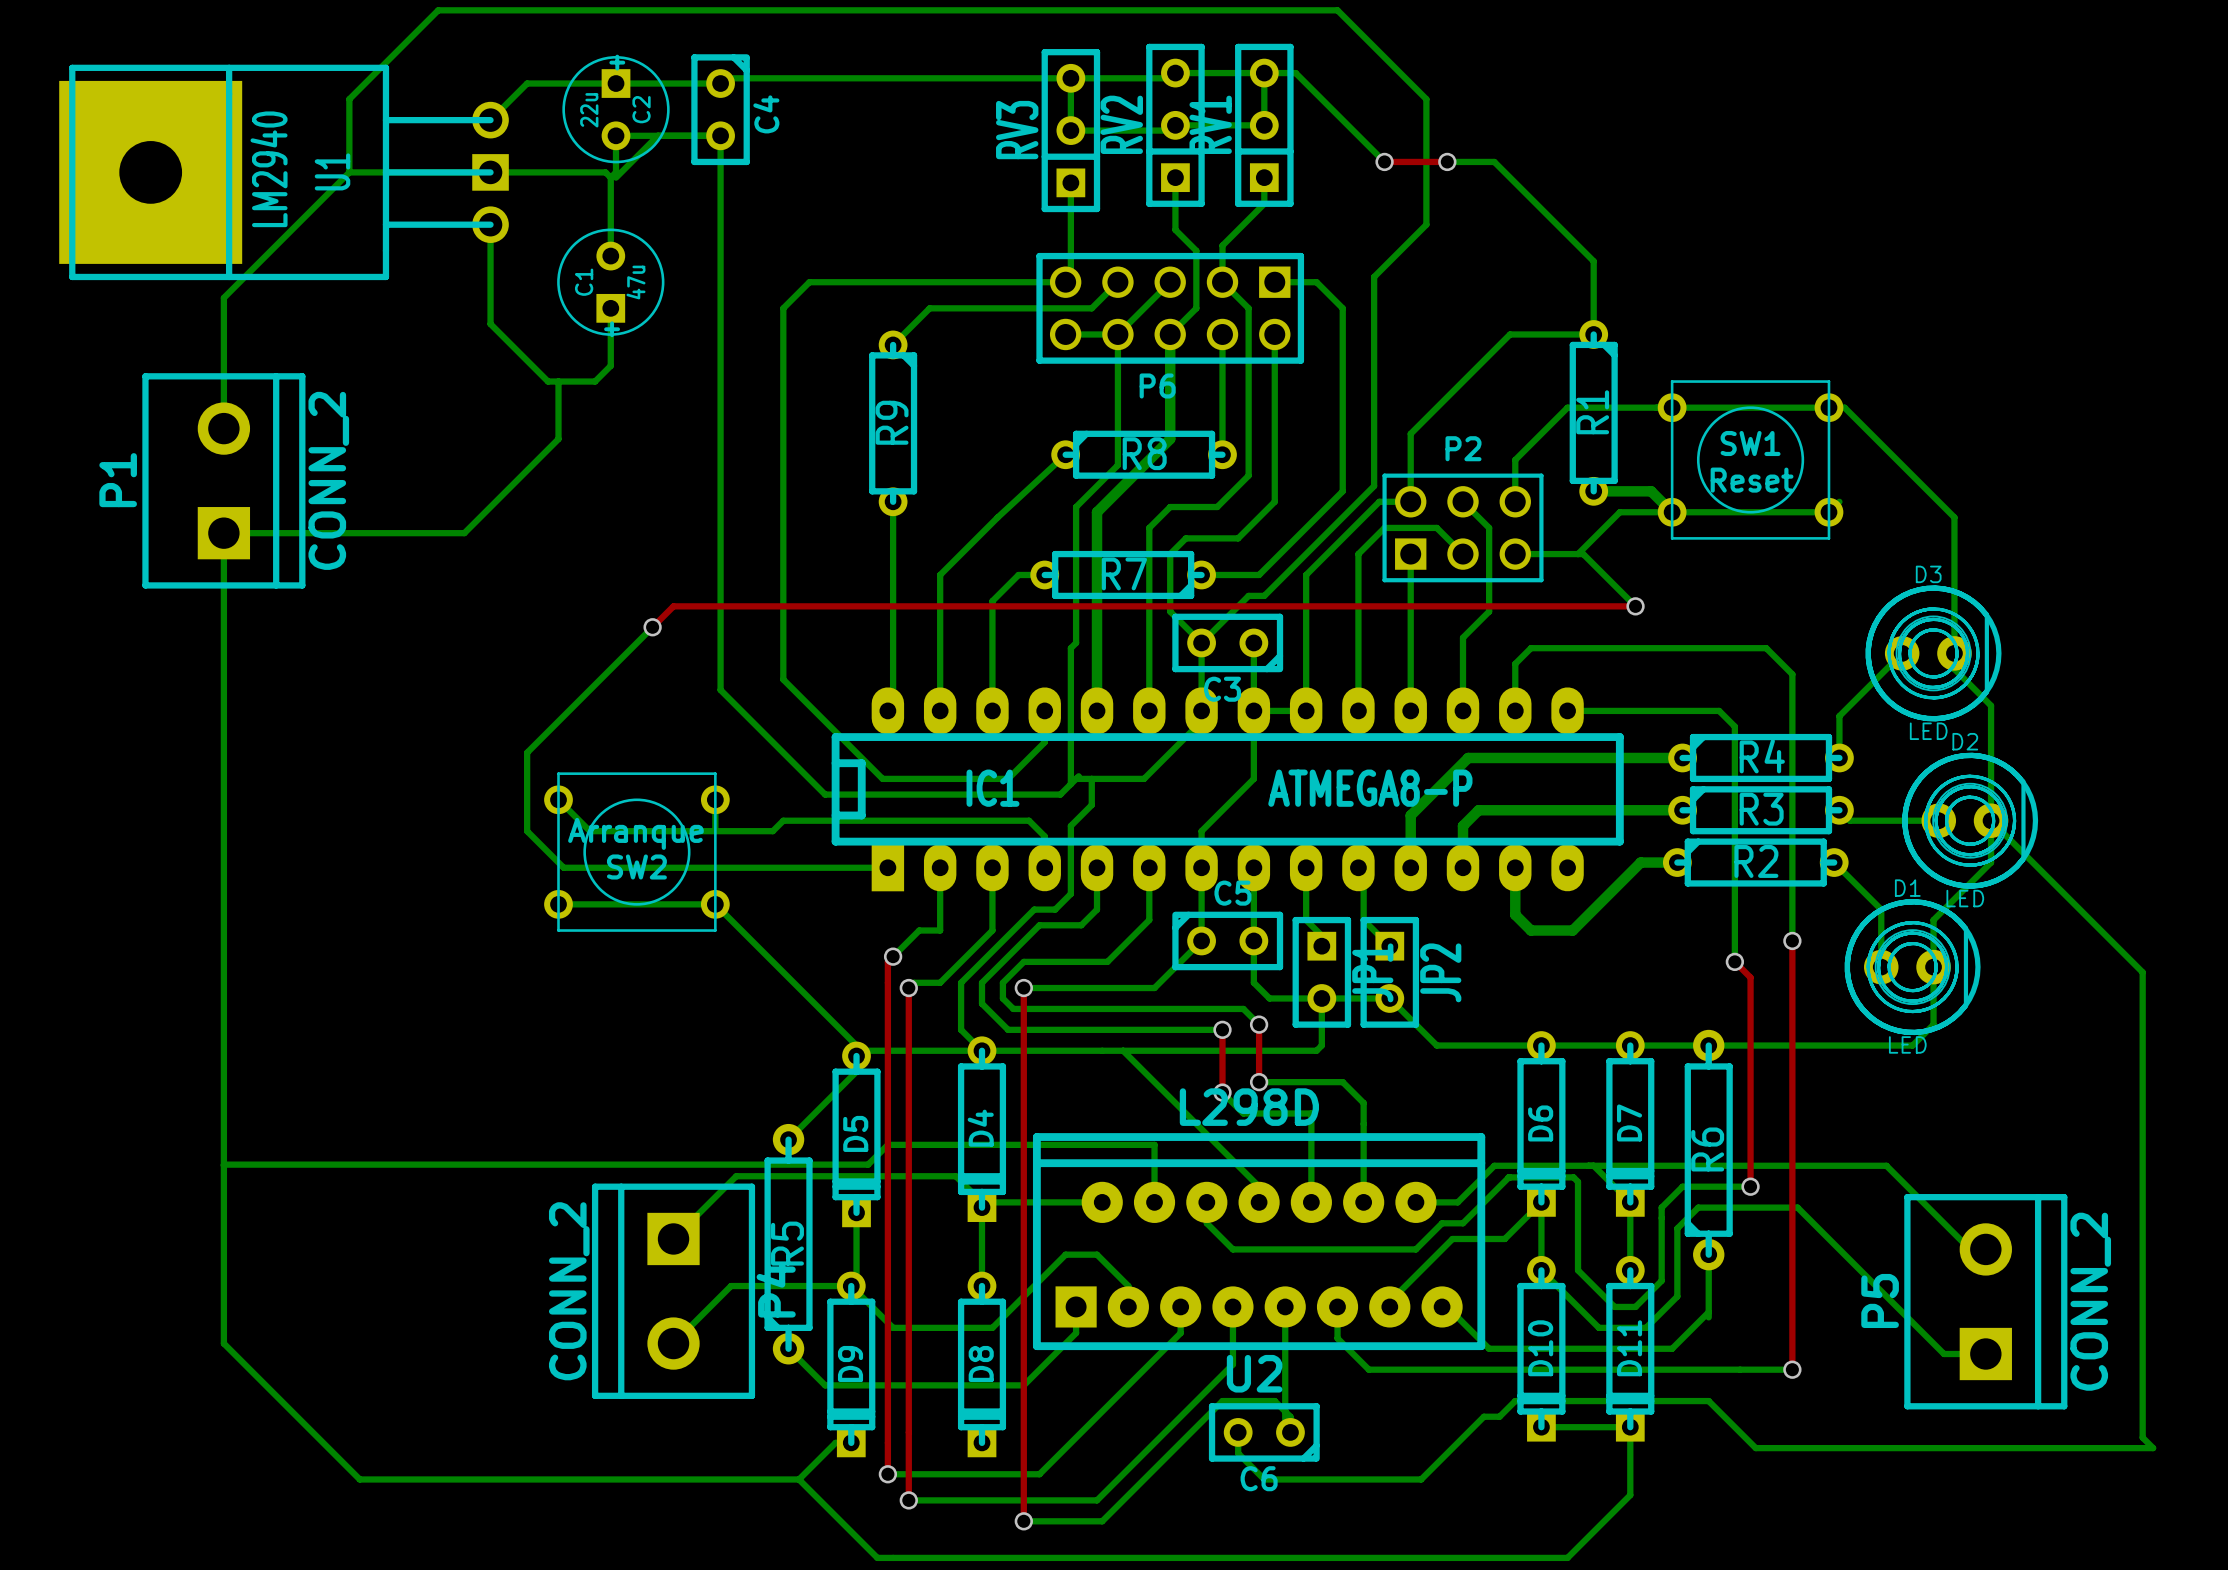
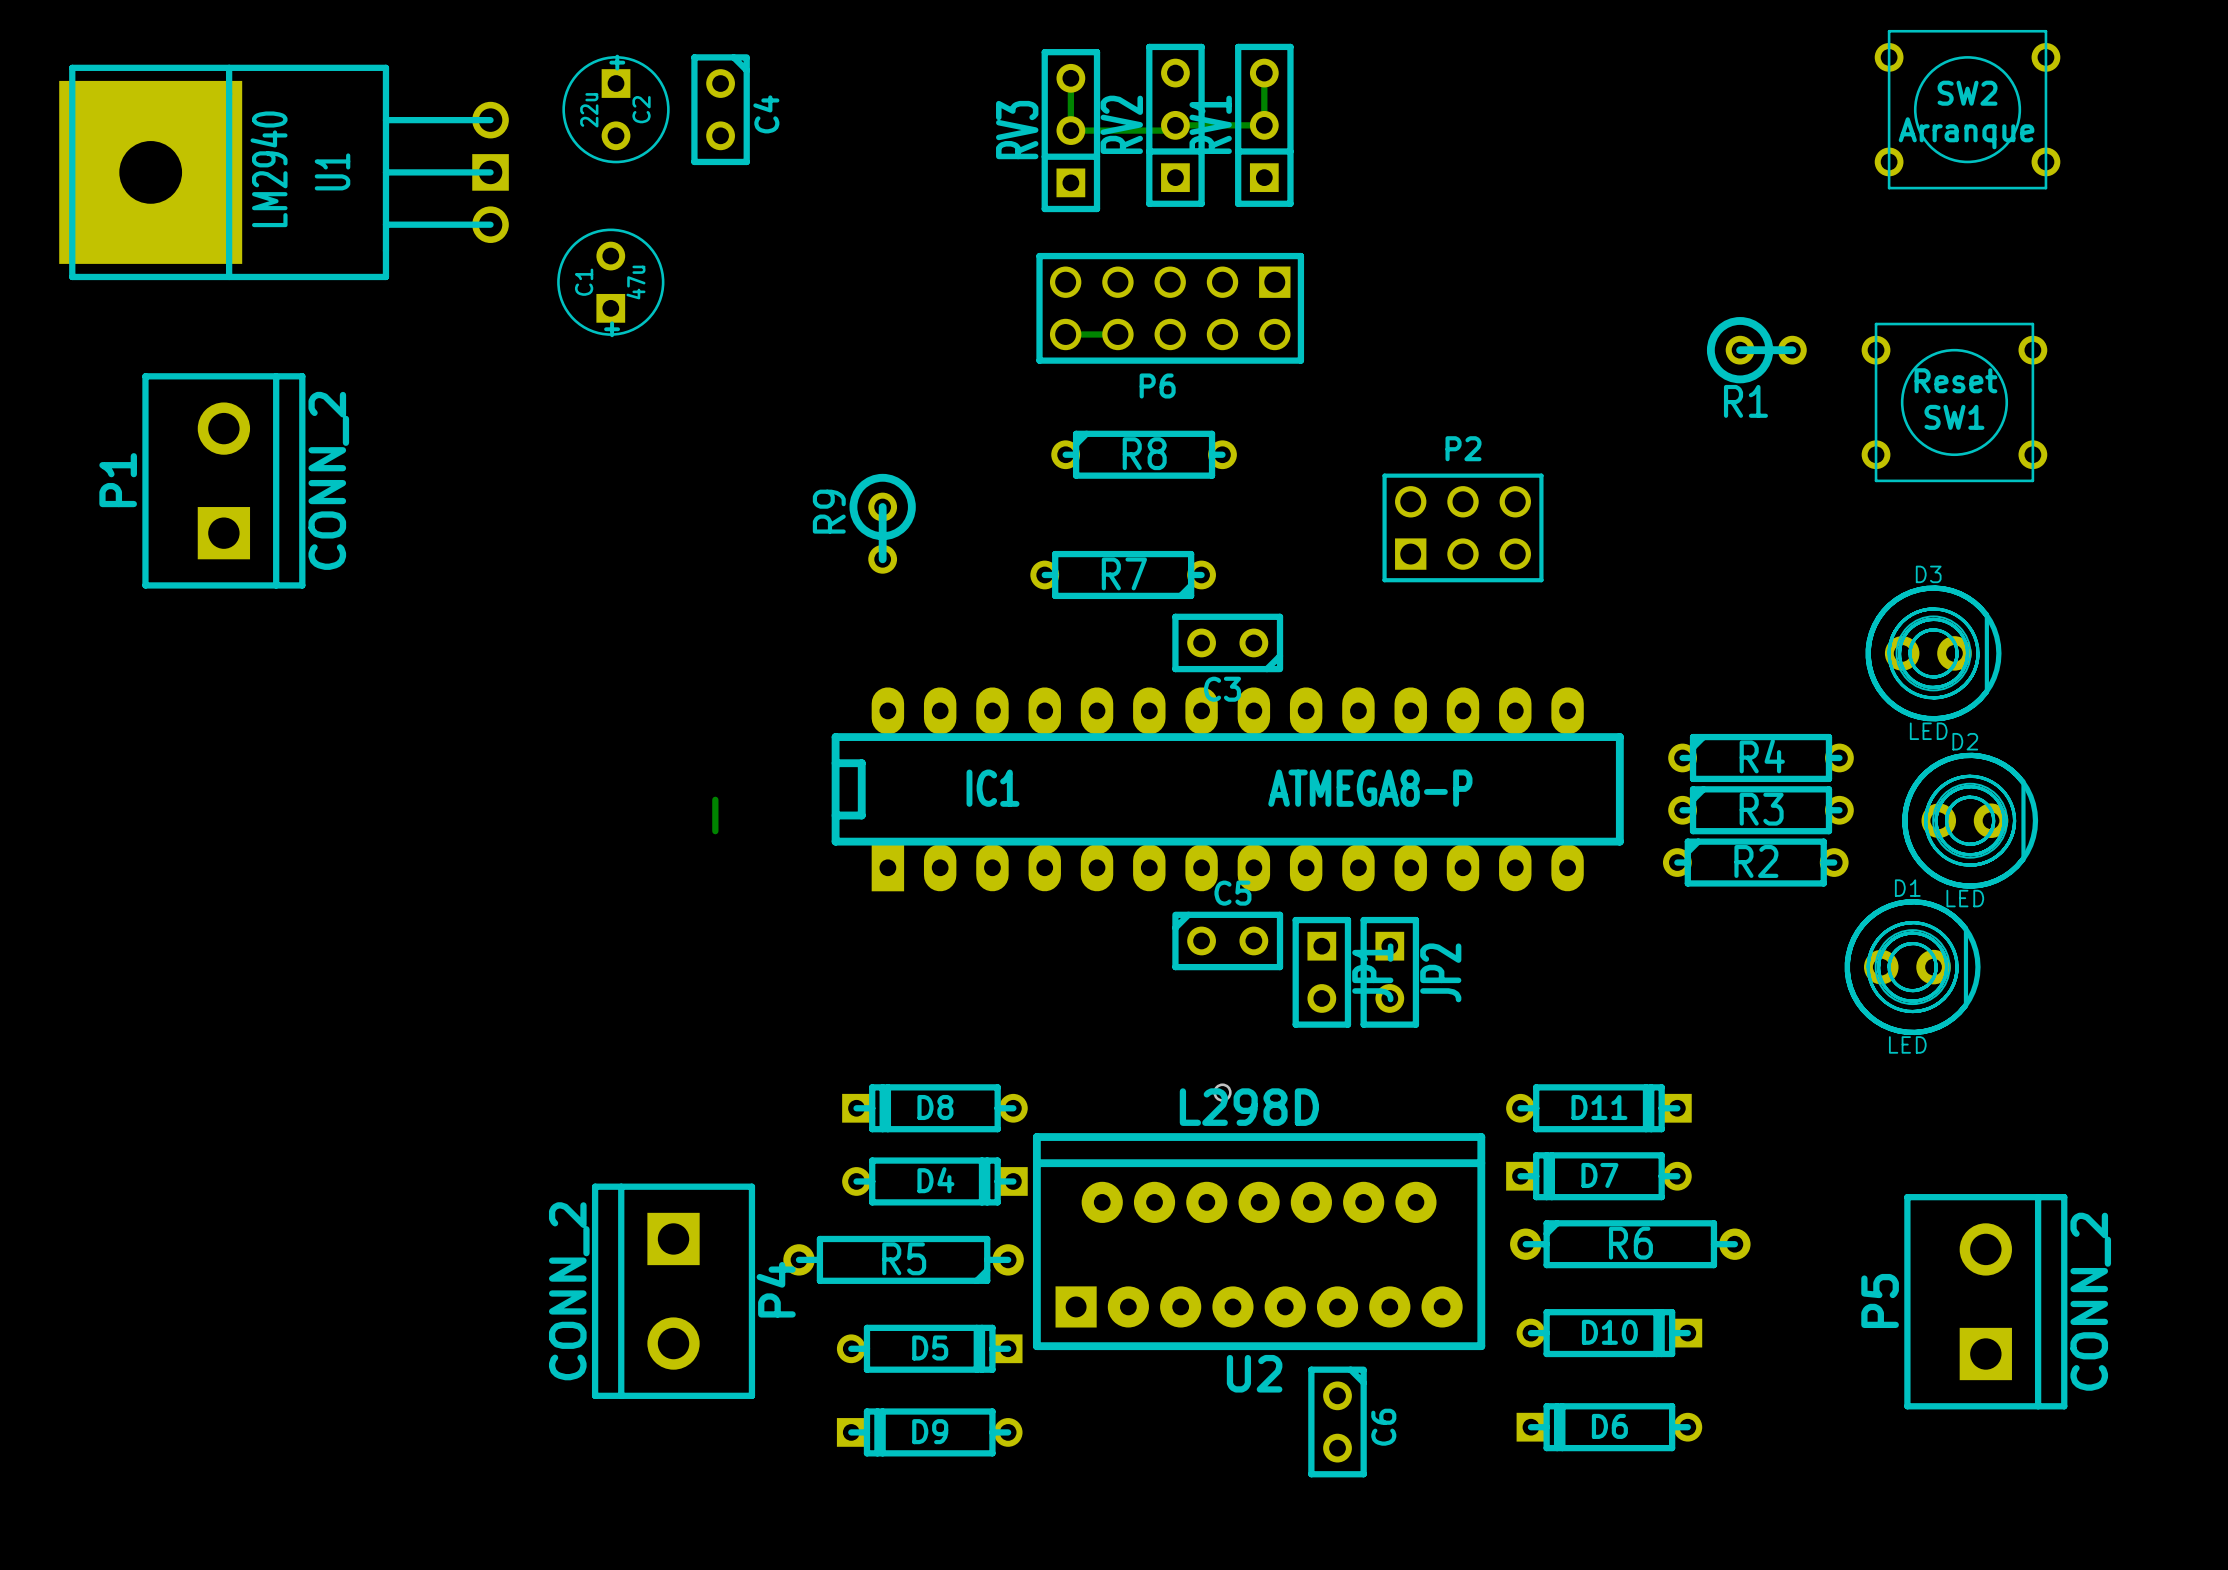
bottom track: (490, 120) (527, 83) (720, 83) (725, 78) (1170, 78) (1175, 73) (1295, 73) (1384, 161) -> none
bottom track: (657, 135) (616, 177) -> none
top track: (1384, 161) (1447, 161) -> none
via: (1384, 161) -> none
bottom track: (1447, 161) (1494, 161) (1593, 261) (1593, 334) (1510, 334) (1410, 433) (1410, 501) (1379, 501) (1306, 574) (1306, 710) (1253, 710) -> none
via: (1447, 161) -> none
bottom track: (349, 172) (349, 99) (438, 10) (1337, 10) (1426, 99) (1426, 224) (1374, 276) (1374, 486) (1264, 595) (1248, 595) (1201, 642) -> none
bottom track: (349, 172) (605, 172) (610, 177) -> none
bottom track: (349, 172) (223, 297) (223, 428) -> none
bottom track: (610, 177) (610, 256) -> none
bottom track: (610, 177) (616, 172) (616, 135) (720, 135) (720, 690) (825, 794) (1060, 794) (1078, 776) -> none
bottom track: (1175, 177) (1175, 229) (1196, 250) (1196, 308) (1170, 334) (1170, 439) (1097, 512) (1097, 710) -> none
bottom track: (1264, 177) (1264, 203) (1222, 245) (1222, 282) (1248, 308) (1248, 475) (1217, 507) (1170, 507) (1149, 527) (1149, 710) -> none
bottom track: (1070, 182) (1070, 276) (1065, 282) (809, 282) (783, 308) (783, 679) (882, 778) (1008, 778) (1044, 742) (1044, 710) -> none
bottom track: (490, 224) (490, 324) (548, 381) (595, 381) (610, 365) (610, 308) -> none
bottom track: (1117, 282) (1091, 308) (929, 308) (893, 344) -> none
bottom track: (1170, 282) (1117, 334) (1117, 465) (1076, 507) (1076, 642) (1070, 648) (1070, 784) -> none
bottom track: (1274, 282) (1316, 282) (1342, 308) (1342, 491) (1259, 574) (1201, 574) -> none
R1 footprint: [1569, 320, 1618, 506] -> [1706, 317, 1807, 384]
R9 footprint: [869, 330, 918, 517] -> [849, 473, 916, 574]
bottom track: (1222, 334) (1222, 454) -> none
bottom track: (1274, 334) (1274, 501) (1238, 538) (1185, 538) (1170, 554) (1170, 611) (1201, 642) -> none
bottom track: (558, 381) (558, 439) (464, 533) (223, 533) (223, 1343) (359, 1479) (799, 1479) -> none
R1 name position: R1 (1592, 412) -> R1 (1745, 401)
R9 name position: R9 (892, 422) -> R9 (829, 511)
SW1 name position: SW1 (1750, 443) -> SW1 (1954, 417)
bottom track: (1065, 454) (997, 517) (940, 574) (940, 710) -> none
SW1 position: (1750, 459) -> (1954, 402)
SW1 value position: Reset (1752, 480) -> Reset (1955, 380)
bottom track: (1593, 491) (1651, 491) (1672, 512) -> none
bottom track: (893, 501) (893, 705) (887, 710) -> none
bottom track: (1463, 501) (1489, 527) (1489, 611) (1463, 637) (1463, 710) -> none
bottom track: (1515, 501) (1515, 459) (1567, 407) (1844, 407) (1954, 517) (1954, 669) (1991, 705) (1991, 862) (1933, 920) (1933, 1024) (1912, 1045) (1436, 1045) (1389, 998) (1269, 998) (1253, 982) (1253, 867) -> none
bottom track: (1839, 501) (1828, 512) (1619, 512) (1578, 554) -> none
bottom track: (1410, 554) (1410, 710) -> none
bottom track: (1463, 554) (1436, 527) (1384, 527) (1358, 554) (1358, 710) -> none
bottom track: (1515, 554) (1583, 554) (1635, 606) -> none
bottom track: (1044, 574) (1018, 574) (992, 601) (992, 710) -> none
top track: (1635, 606) (673, 606) (652, 627) -> none
via: (1635, 606) -> none
bottom track: (652, 627) (527, 752) (527, 831) (563, 867) (887, 867) -> none
via: (652, 627) -> none
bottom track: (1201, 642) (1201, 721) (1144, 778) (1076, 778) -> none
bottom track: (1253, 642) (1253, 778) (1201, 831) (1201, 940) (1154, 988) (1023, 988) -> none
bottom track: (1902, 653) (1839, 716) (1839, 757) -> none
bottom track: (1515, 710) (1515, 663) (1530, 648) (1766, 648) (1792, 674) (1792, 940) -> none
bottom track: (1567, 710) (1719, 710) (1734, 726) (1734, 961) -> none
bottom track: (1682, 757) (1468, 757) (1410, 815) (1410, 867) -> none
bottom track: (1091, 778) (1091, 805) (1070, 825) (1070, 893) (1055, 909) (1034, 909) (961, 982) (961, 1029) (981, 1050) -> none
bottom track: (558, 799) (589, 831) (772, 831) (783, 820) (1029, 820) (1044, 836) (1044, 867) -> none
bottom track: (1682, 810) (1478, 810) (1463, 825) (1463, 867) -> none
bottom track: (1839, 810) (1849, 820) (1938, 820) -> none
bottom track: (1991, 820) (2142, 972) (2142, 1437) (2153, 1448) (1755, 1448) (1708, 1401) (1515, 1401) (1499, 1416) (1483, 1416) (1421, 1479) (1264, 1479) (1238, 1453) (1238, 1432) -> none
SW2 value position: Arranque (635, 833) -> Arranque (1966, 133)
SW2 position: (636, 852) -> (1967, 109)
bottom track: (1677, 862) (1640, 862) (1572, 930) (1530, 930) (1515, 914) (1515, 867) -> none
bottom track: (1834, 862) (1881, 909) (1881, 967) -> none
SW2 name position: SW2 (636, 866) -> SW2 (1967, 93)
bottom track: (940, 867) (940, 930) (919, 930) (893, 956) -> none
bottom track: (992, 867) (992, 930) (940, 982) (914, 982) (908, 988) -> none
bottom track: (1097, 867) (1097, 909) (1081, 925) (1039, 925) (981, 982) (981, 1003) (1008, 1029) (1222, 1029) -> none
bottom track: (1149, 867) (1149, 920) (1107, 961) (1023, 961) (1002, 982) (1002, 998) (1013, 1008) (1243, 1008) (1259, 1024) -> none
bottom track: (1306, 867) (1306, 920) (1321, 935) (1321, 946) -> none
bottom track: (1358, 867) (1363, 873) (1363, 920) (1389, 946) -> none
bottom track: (558, 904) (715, 904) (856, 1045) (856, 1071) (788, 1139) -> none
top track: (1792, 940) (1792, 1369) -> none
via: (1792, 940) -> none
top track: (893, 956) (887, 961) (887, 1474) -> none
via: (893, 956) -> none
top track: (1734, 961) (1750, 977) (1750, 1186) -> none
via: (1734, 961) -> none
top track: (908, 988) (908, 1500) -> none
via: (908, 988) -> none
top track: (1023, 988) (1023, 1521) -> none
via: (1023, 988) -> none
bottom track: (1321, 998) (1321, 1045) (1316, 1050) (861, 1050) (856, 1055) -> none
top track: (1259, 1024) (1259, 1082) -> none
via: (1259, 1024) -> none
top track: (1222, 1029) (1222, 1092) -> none
via: (1222, 1029) -> none
bottom track: (1123, 1050) (1259, 1186) (1259, 1202) -> none
bottom track: (1259, 1082) (1342, 1082) (1363, 1103) (1363, 1202) -> none
via: (1259, 1082) -> none
bottom track: (1222, 1092) (1243, 1113) (1311, 1113) (1311, 1202) -> none
D6 rotation: 0° (1541, 1123) -> 90° clockwise (1609, 1427)
D6 position: (1541, 1123) -> (1609, 1427)
D7 rotation: 0° (1630, 1123) -> 90° clockwise (1598, 1176)
D4 rotation: 0° (981, 1129) -> 90° counterclockwise (934, 1181)
D5 rotation: 0° (856, 1134) -> 90° counterclockwise (929, 1348)
D5 position: (856, 1134) -> (929, 1348)
R6 rotation: 0° (1708, 1150) -> 90° clockwise (1630, 1244)
bottom track: (223, 1164) (868, 1164) (887, 1144) (1154, 1144) (1154, 1202) -> none
bottom track: (1593, 1165) (1630, 1202) (1630, 1270) -> none
bottom track: (1508, 1177) (1573, 1177) (1578, 1181) (1578, 1270) (1614, 1306) (1635, 1306) (1661, 1280) (1661, 1207) (1682, 1186) (1750, 1186) -> none
bottom track: (1508, 1177) (1463, 1223) (1442, 1223) (1415, 1249) (1232, 1249) (1206, 1223) (1206, 1202) -> none
via: (1750, 1186) -> none
bottom track: (1102, 1202) (987, 1202) (981, 1207) -> none
bottom track: (1415, 1202) (1457, 1202) (1494, 1165) (1886, 1165) (1970, 1249) (1985, 1249) -> none
bottom track: (856, 1212) (856, 1280) (851, 1286) -> none
bottom track: (673, 1238) (736, 1176) (955, 1176) (981, 1202) (981, 1286) -> none
R5 rotation: 0° (788, 1244) -> 90° counterclockwise (903, 1259)
bottom track: (1708, 1254) (1708, 1317) -> none
bottom track: (851, 1286) (731, 1286) (673, 1343) -> none
bottom track: (851, 1286) (893, 1327) (992, 1327) (1065, 1254) (1097, 1254) (1128, 1286) (1128, 1306) -> none
bottom track: (1076, 1306) (1076, 1333) (1023, 1385) (825, 1385) (788, 1348) -> none
bottom track: (1180, 1306) (1180, 1333) (1039, 1474) (887, 1474) -> none
bottom track: (1232, 1306) (1232, 1364) (1097, 1500) (908, 1500) -> none
bottom track: (1285, 1306) (1285, 1427) (1290, 1432) (1290, 1416) (1274, 1401) (1222, 1401) (1102, 1521) (1023, 1521) -> none
bottom track: (1337, 1306) (1337, 1338) (1368, 1369) (1792, 1369) -> none
bottom track: (1389, 1306) (1389, 1301) (1452, 1238) (1504, 1238) (1541, 1202) (1541, 1270) (1598, 1327) (1645, 1327) (1677, 1296) (1677, 1228) (1698, 1207) (1797, 1207) (1944, 1354) (1985, 1354) -> none
bottom track: (1442, 1306) (1447, 1306) (1489, 1348) (1672, 1348) (1708, 1312) -> none
D10 rotation: 0° (1541, 1348) -> 90° counterclockwise (1609, 1333)
D11 rotation: 0° (1630, 1348) -> 90° counterclockwise (1598, 1108)
D11 position: (1630, 1348) -> (1598, 1108)
D9 rotation: 0° (851, 1364) -> 90° clockwise (929, 1432)
D8 rotation: 0° (981, 1364) -> 90° clockwise (934, 1108)
D8 position: (981, 1364) -> (934, 1108)
via: (1792, 1369) -> none
bottom track: (1541, 1427) (1630, 1427) (1630, 1495) (1567, 1557) (877, 1557) (799, 1479) -> none
C6 rotation: 0° (1264, 1432) -> 90° counterclockwise (1337, 1421)
C6 position: (1264, 1432) -> (1337, 1421)
bottom track: (851, 1442) (835, 1442) (799, 1479) -> none
via: (887, 1474) -> none
via: (908, 1500) -> none
via: (1023, 1521) -> none

